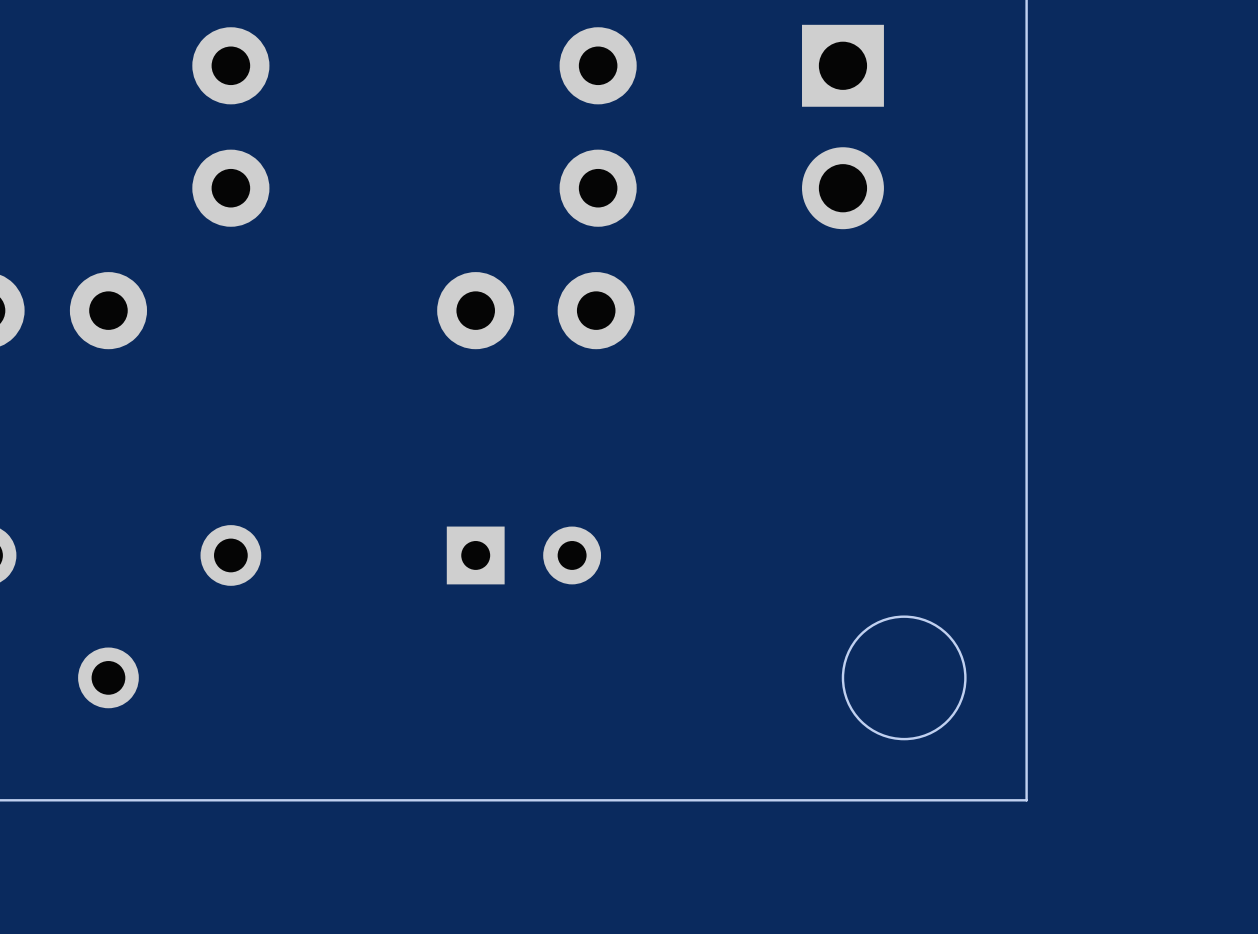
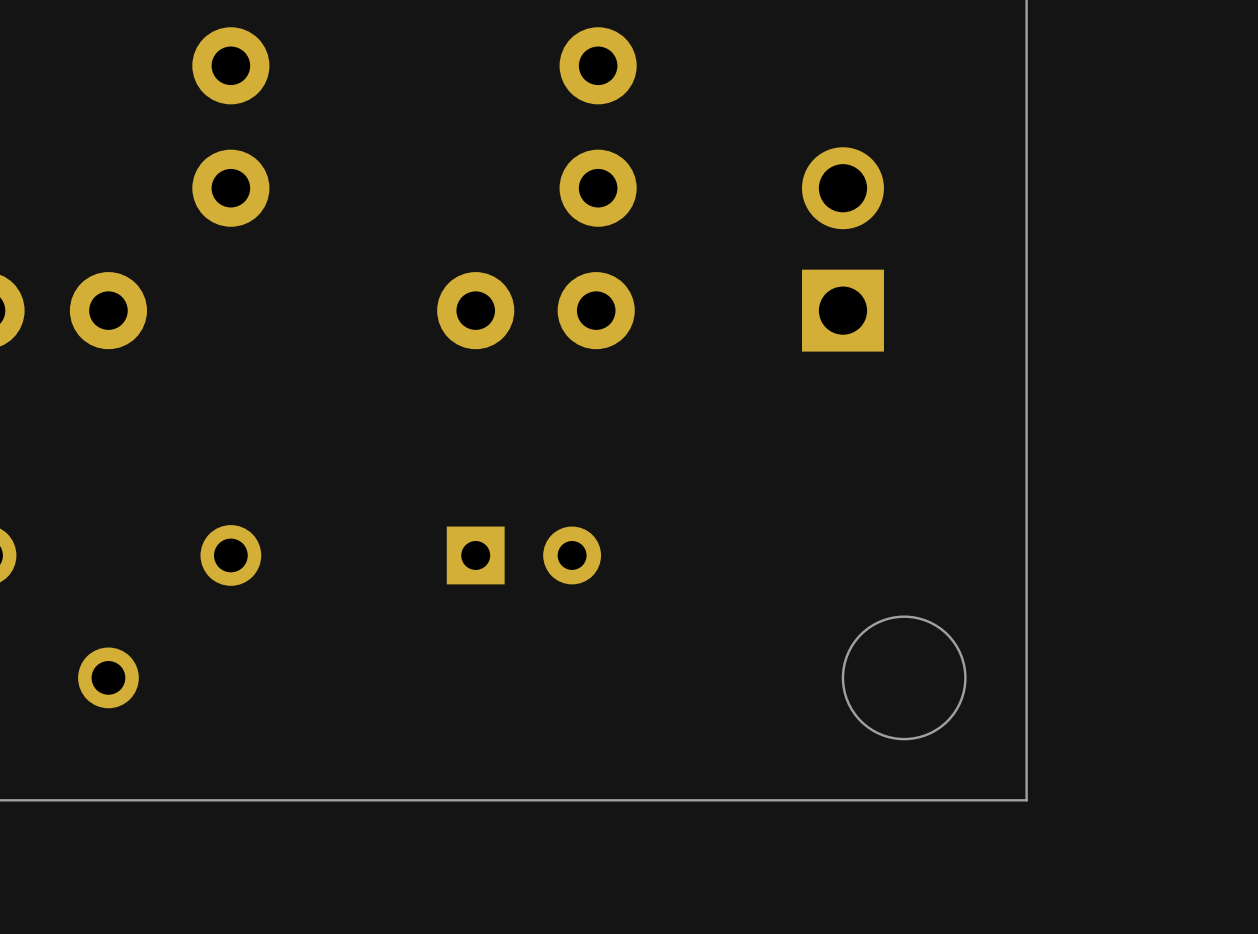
part rotation: 0° (842, 127) -> 180° (842, 249)

